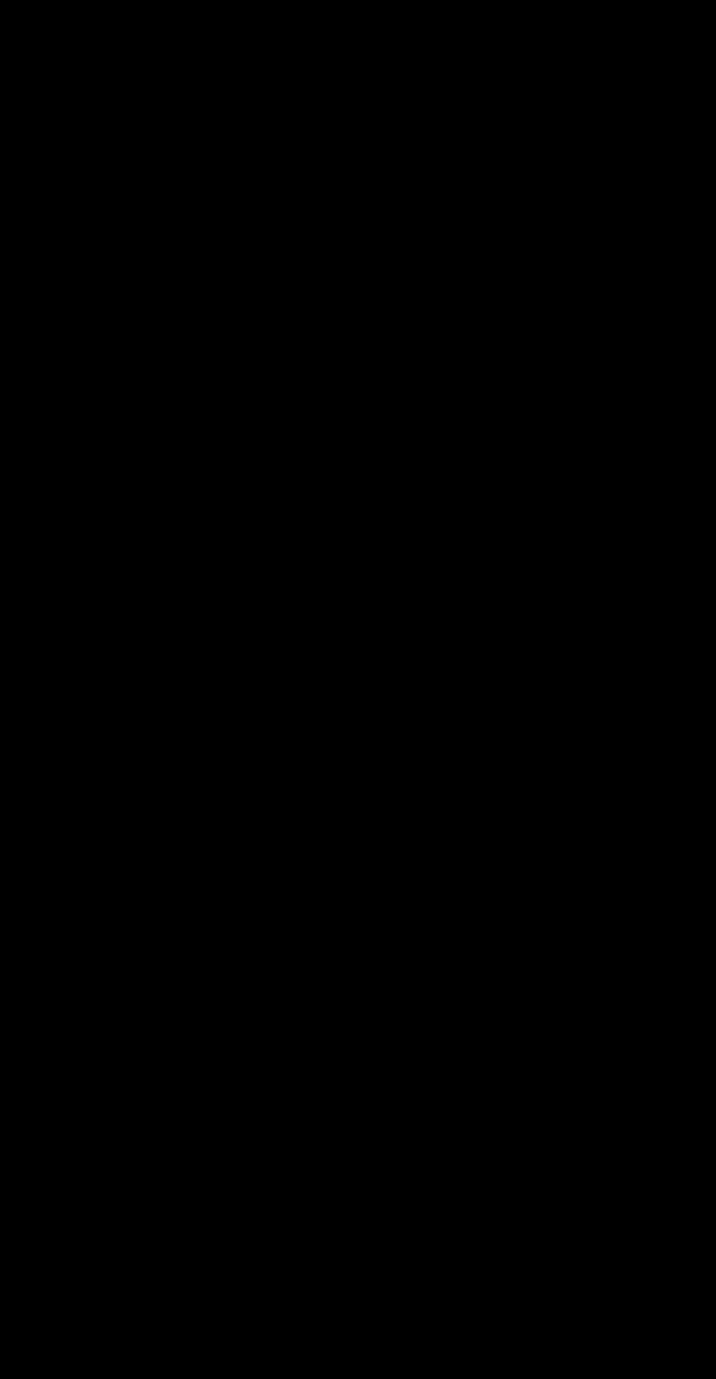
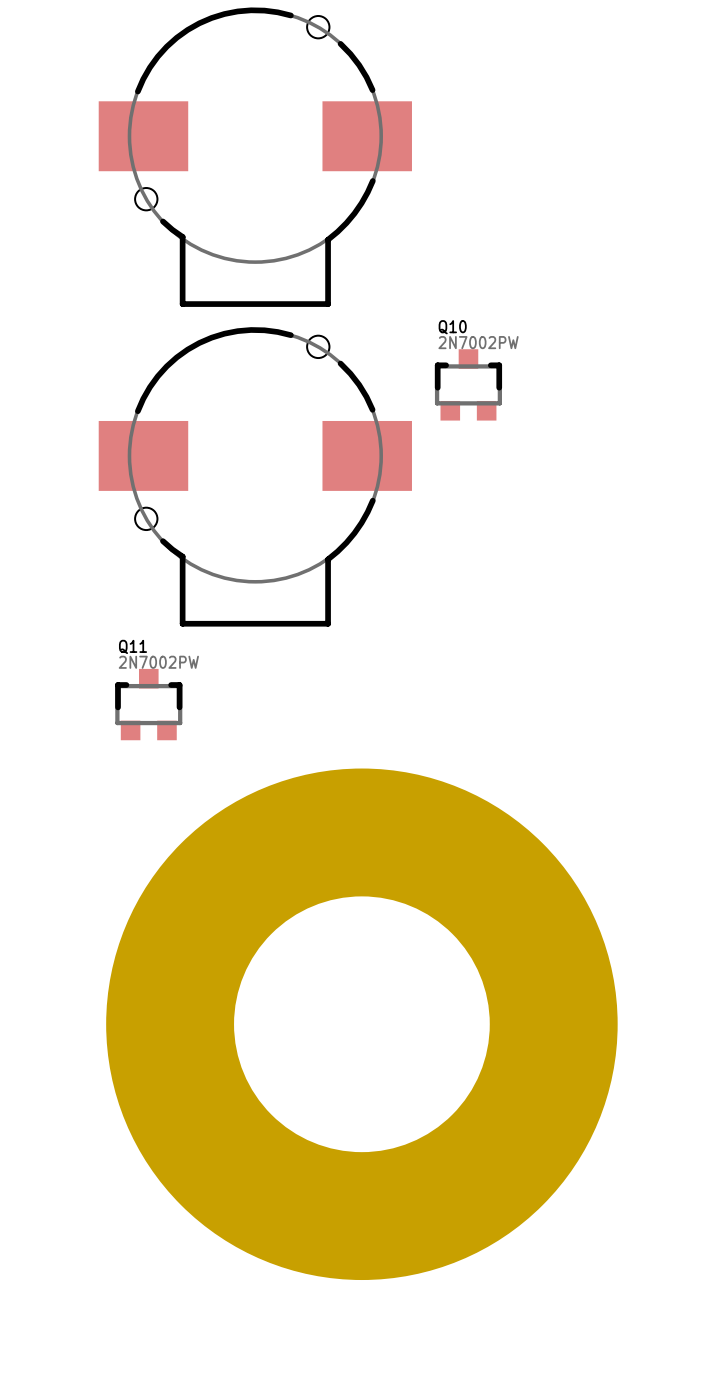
part: none -> (255, 157)
Q10: none -> 2N7002PW (468, 384)
part: none -> (255, 476)
Q11: none -> 2N7002PW (148, 704)
part: none -> (361, 1024)

